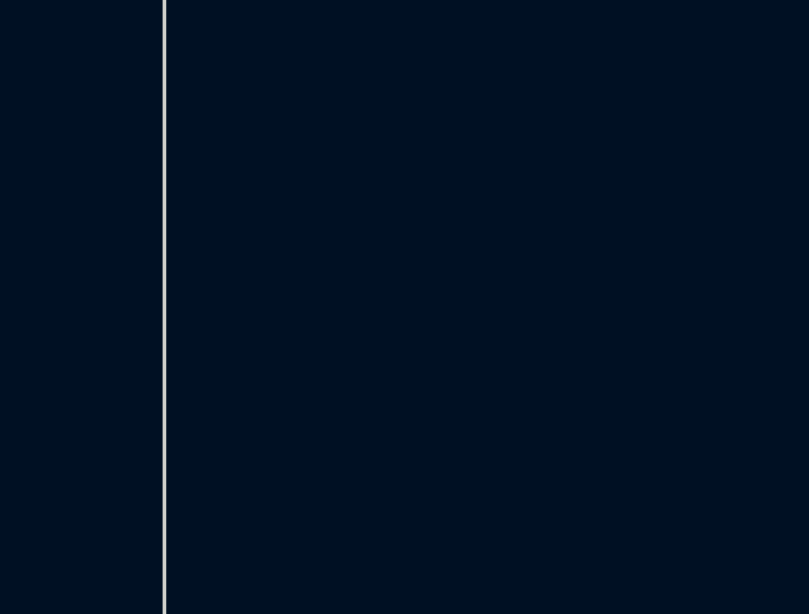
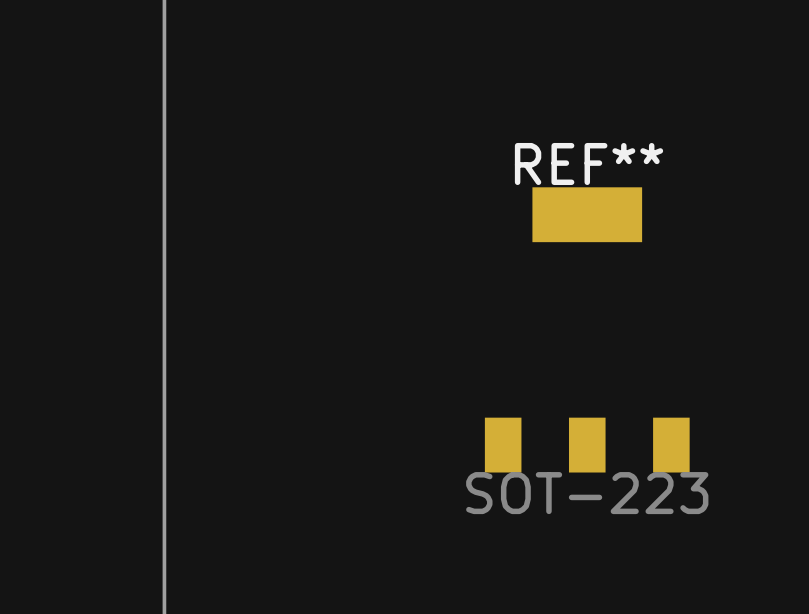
REF**: none -> SOT-223 (587, 329)

